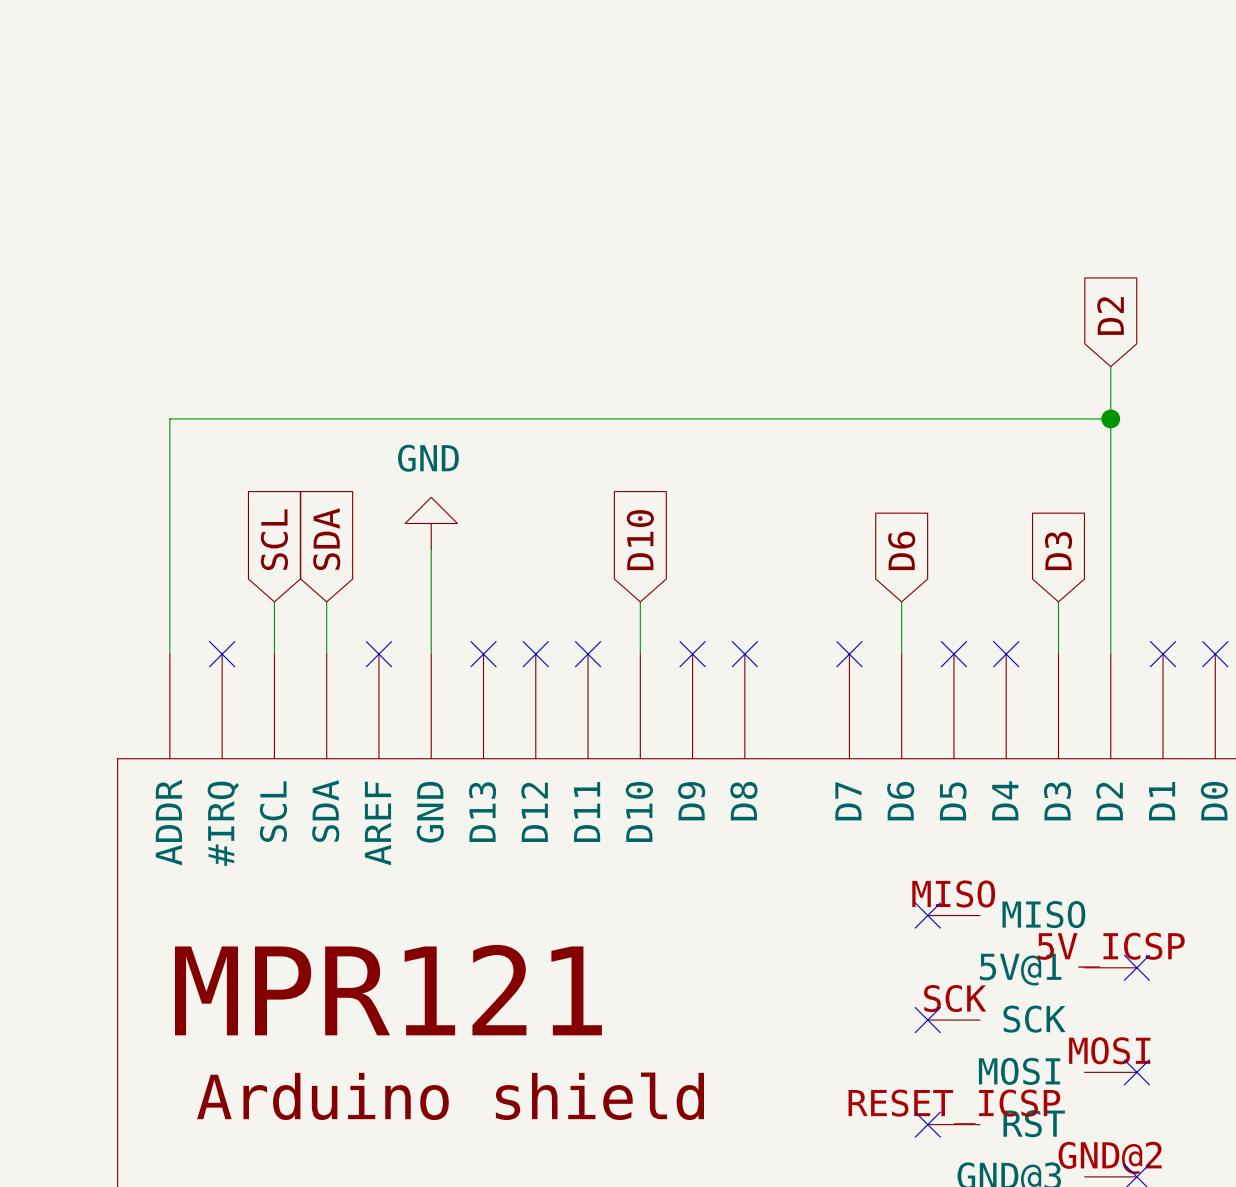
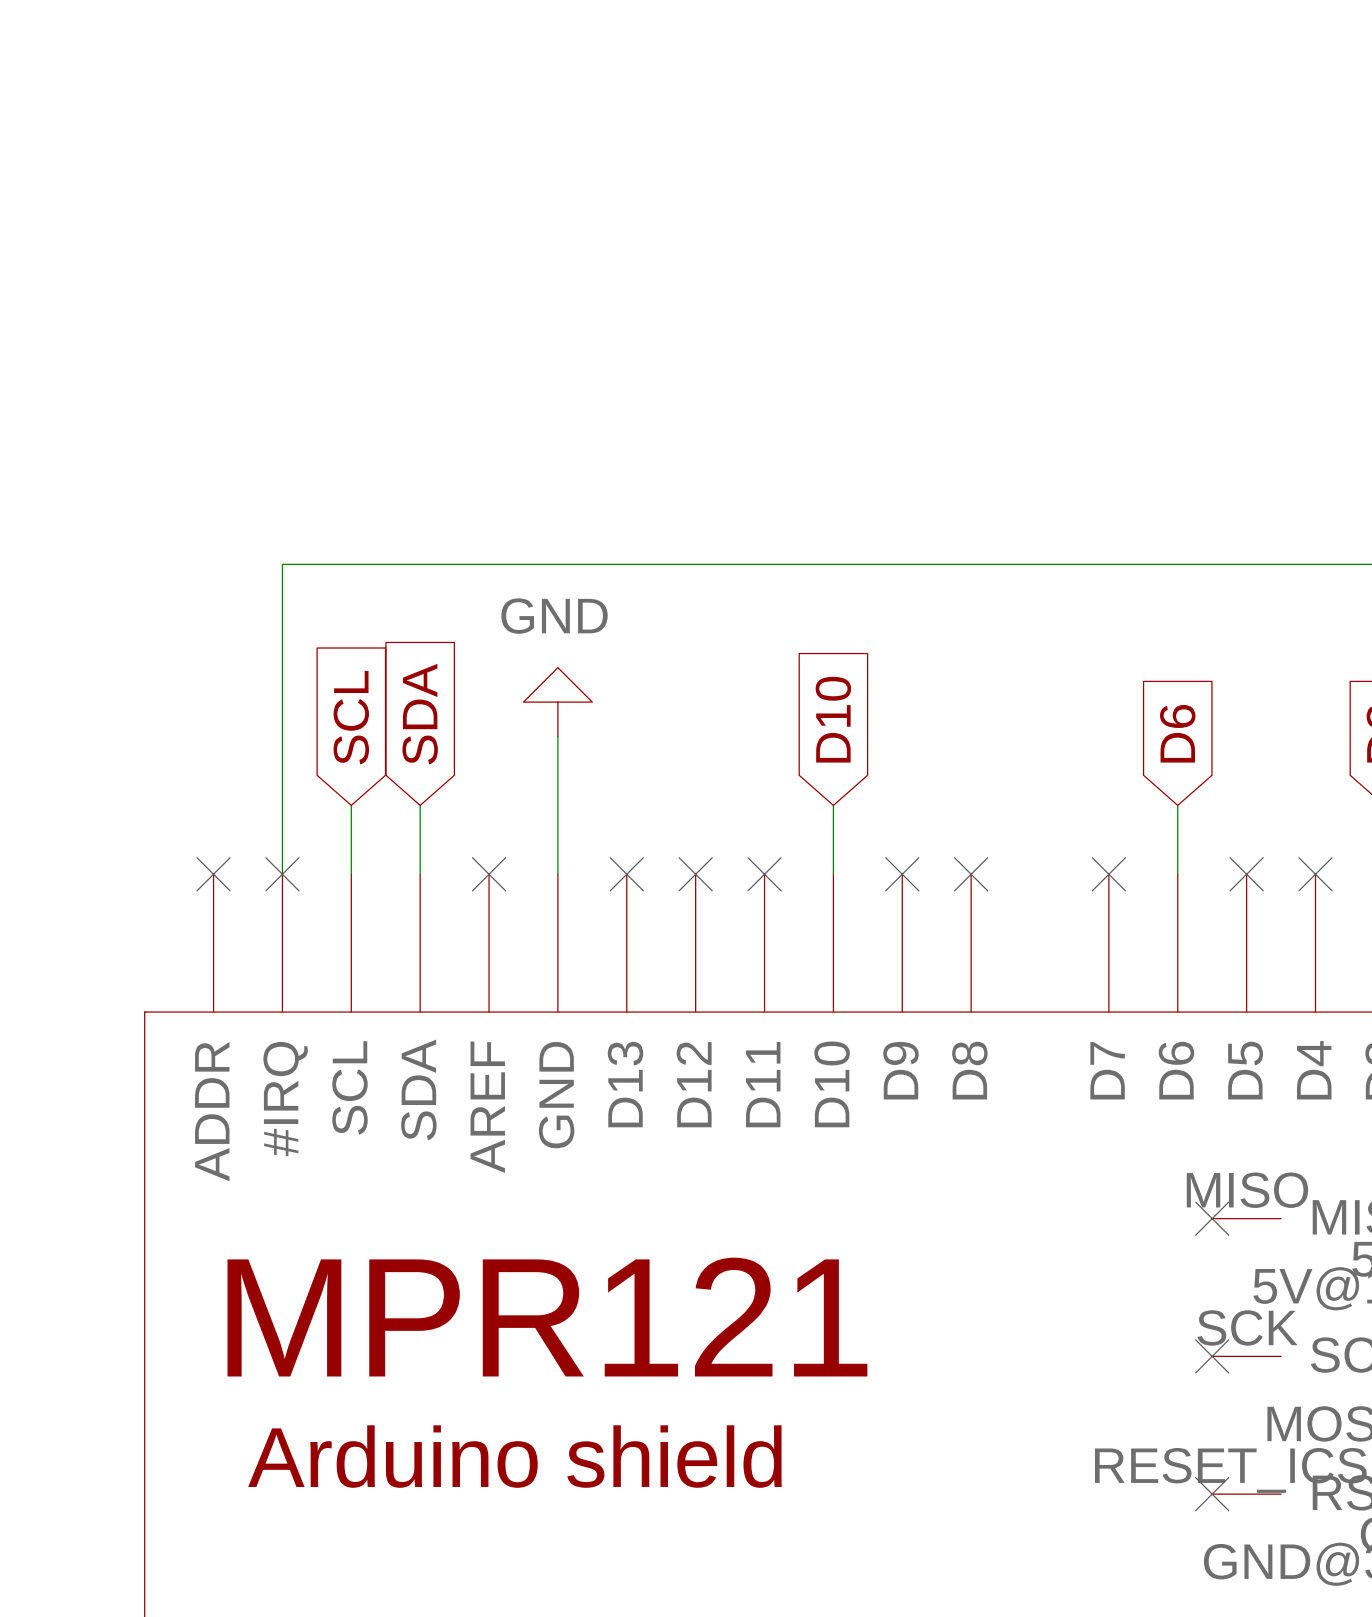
wire: (222, 418) (169, 418) (169, 654) -> (282, 564) (282, 874)
no-connect mark: none -> (213, 874)

